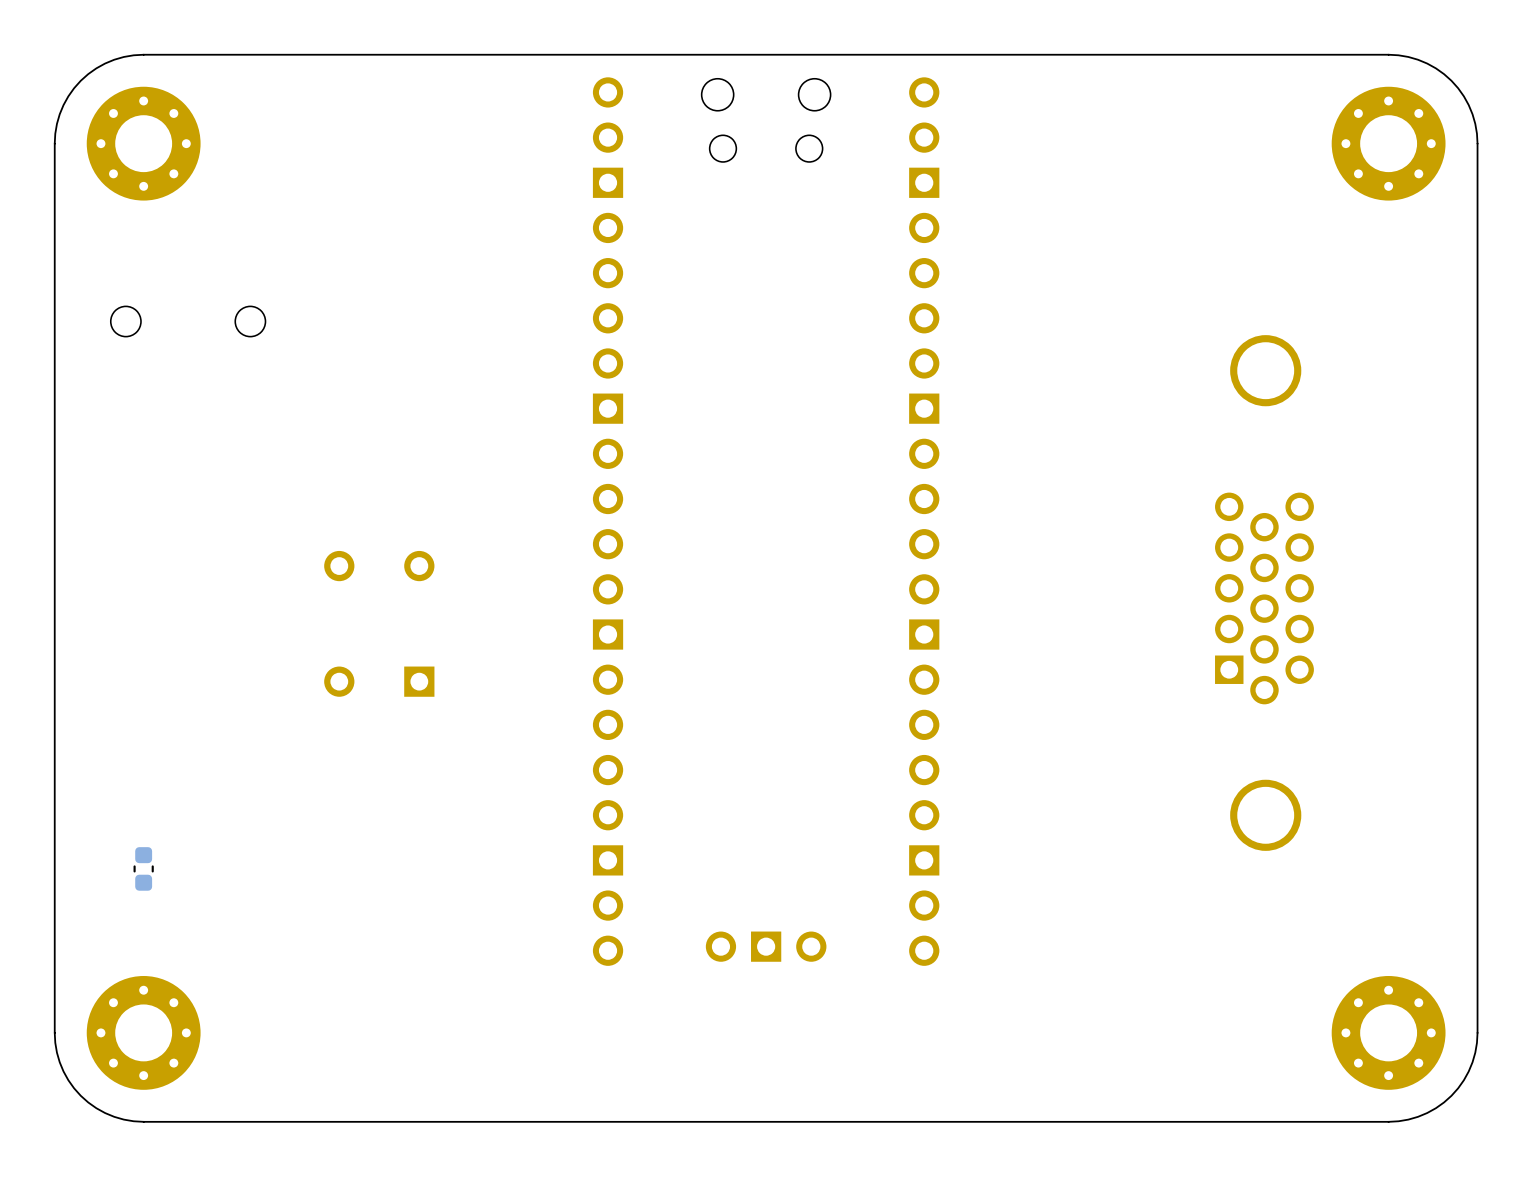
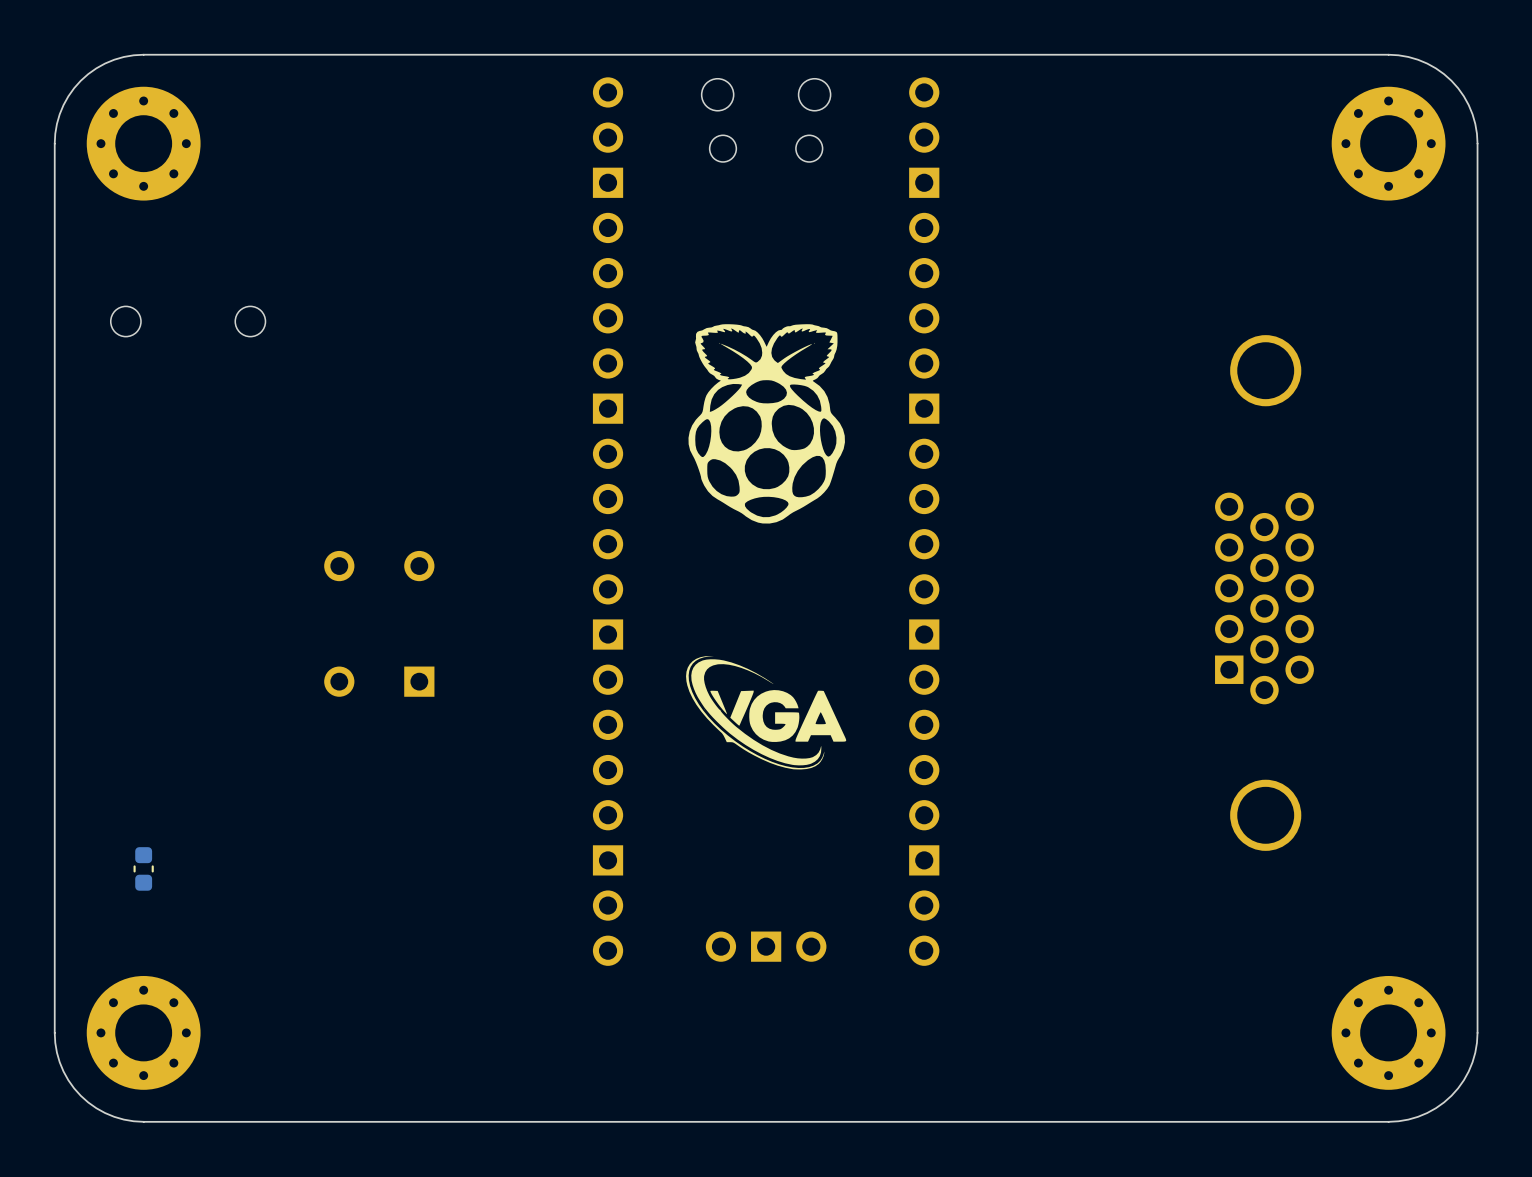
drawing: none -> [688, 324, 845, 524]
drawing: none -> [686, 656, 847, 770]

